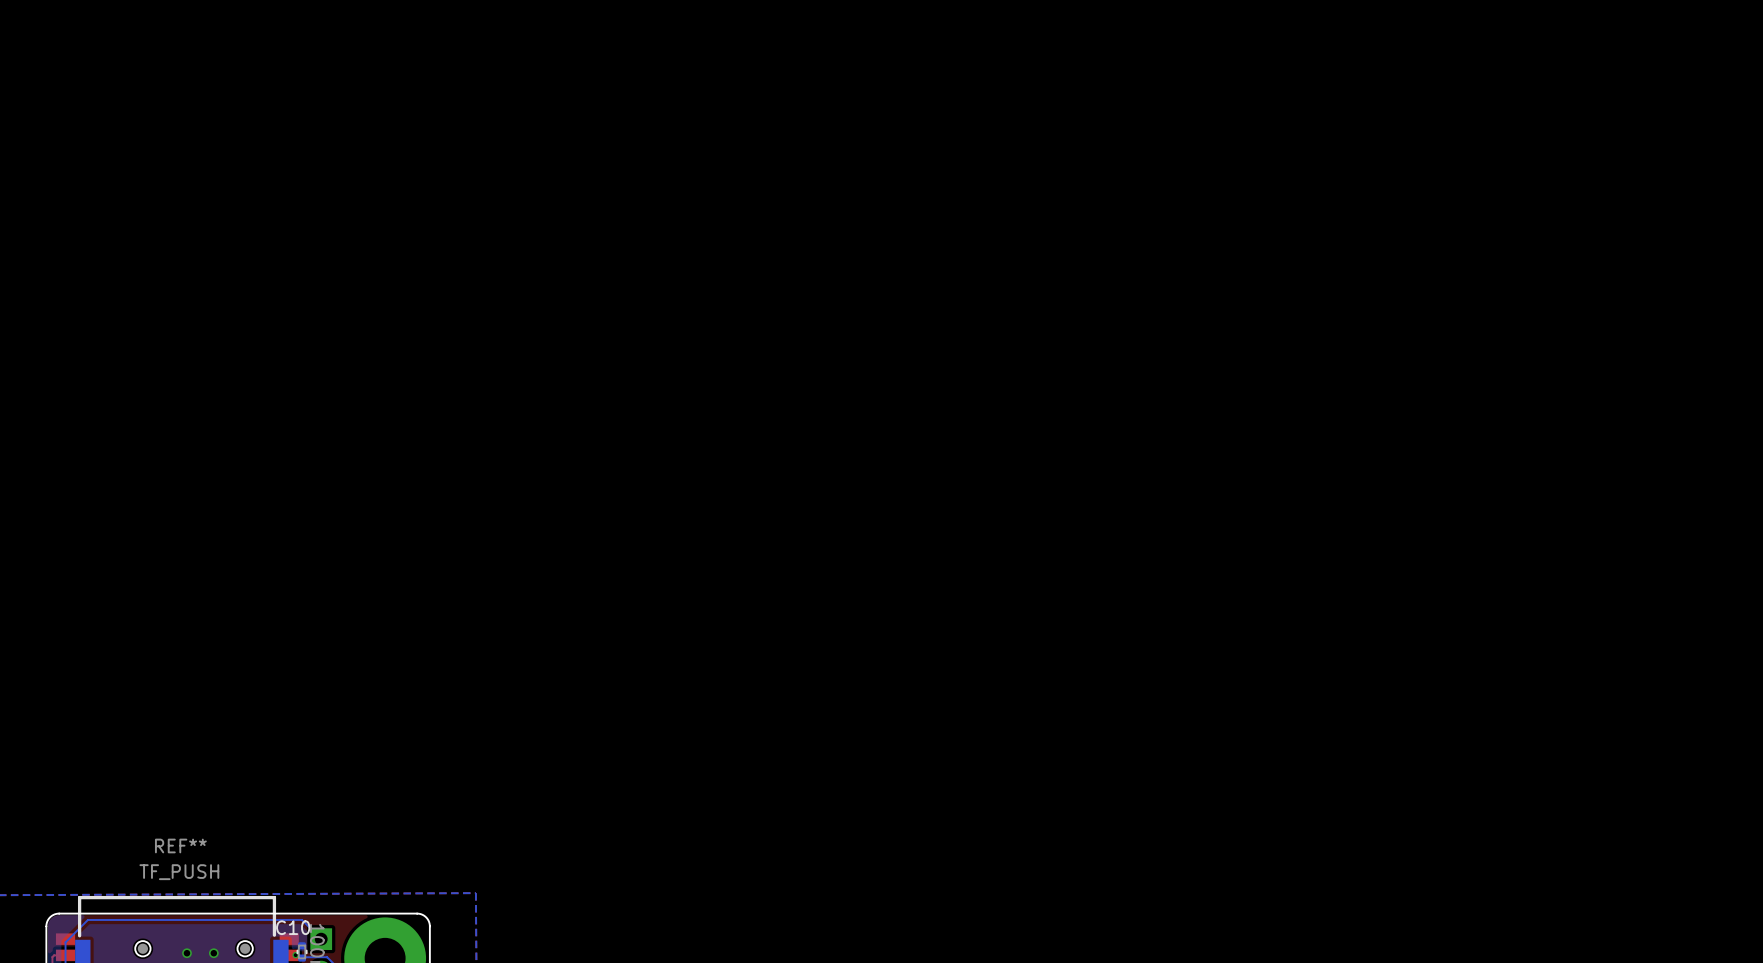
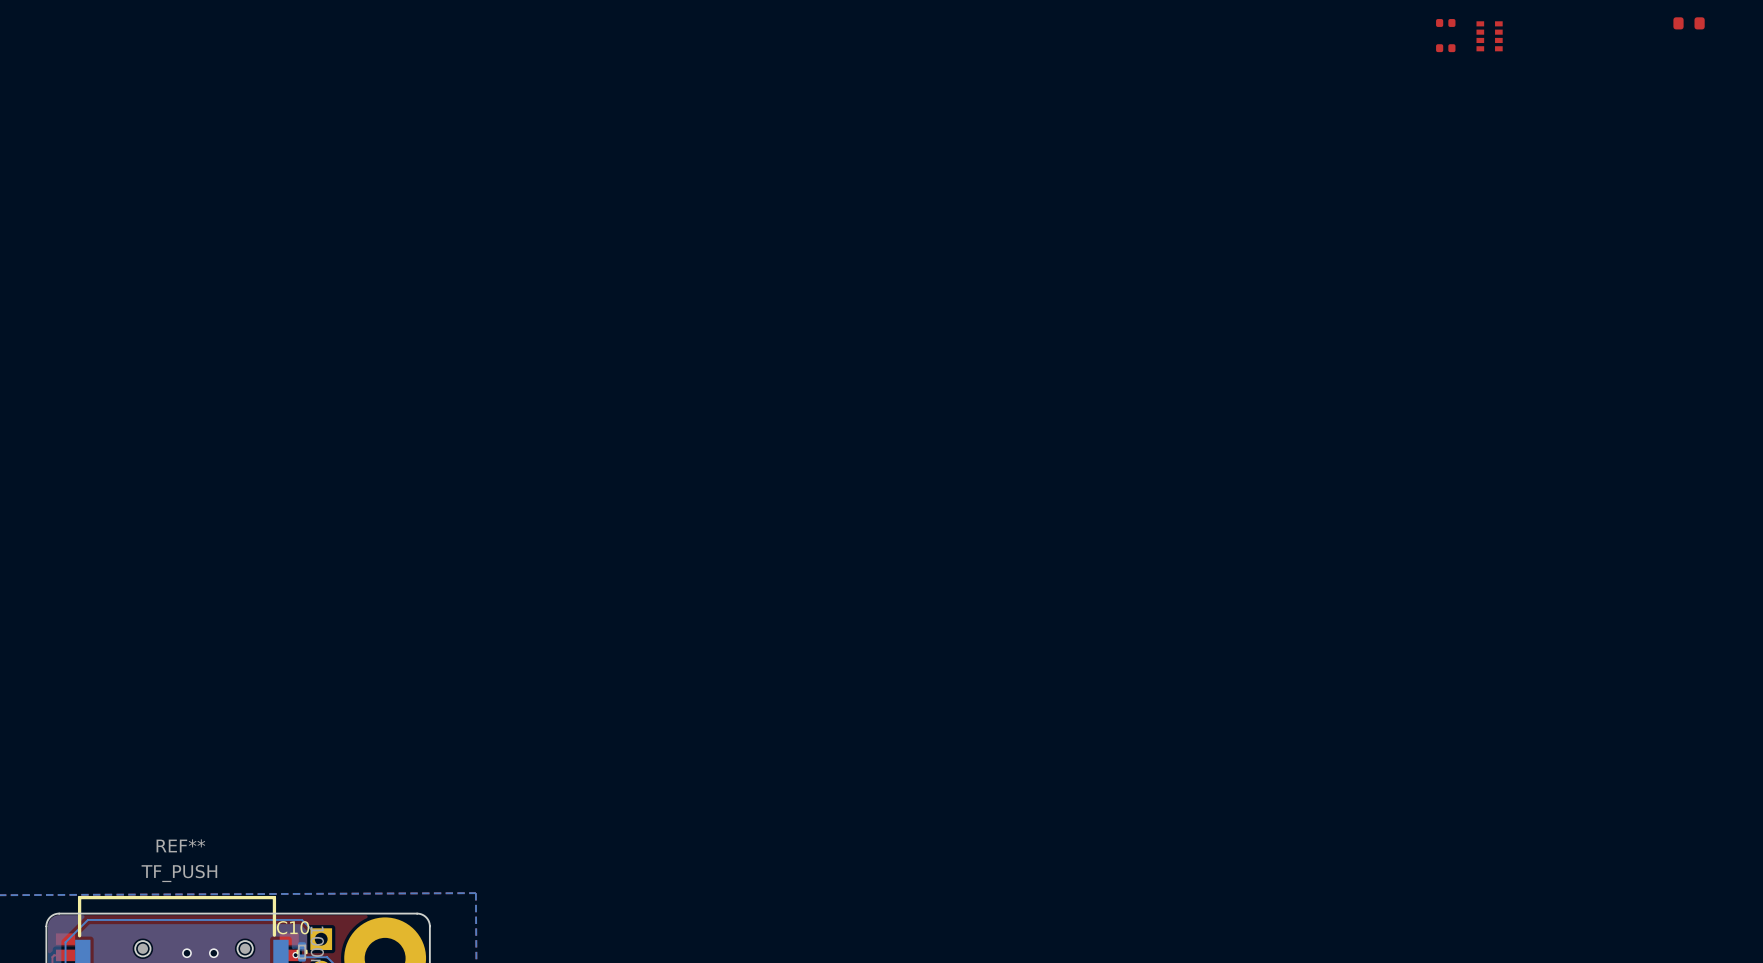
part: none -> (1445, 22)
part: none -> (1689, 23)
part: none -> (1489, 36)
part: none -> (1445, 48)

